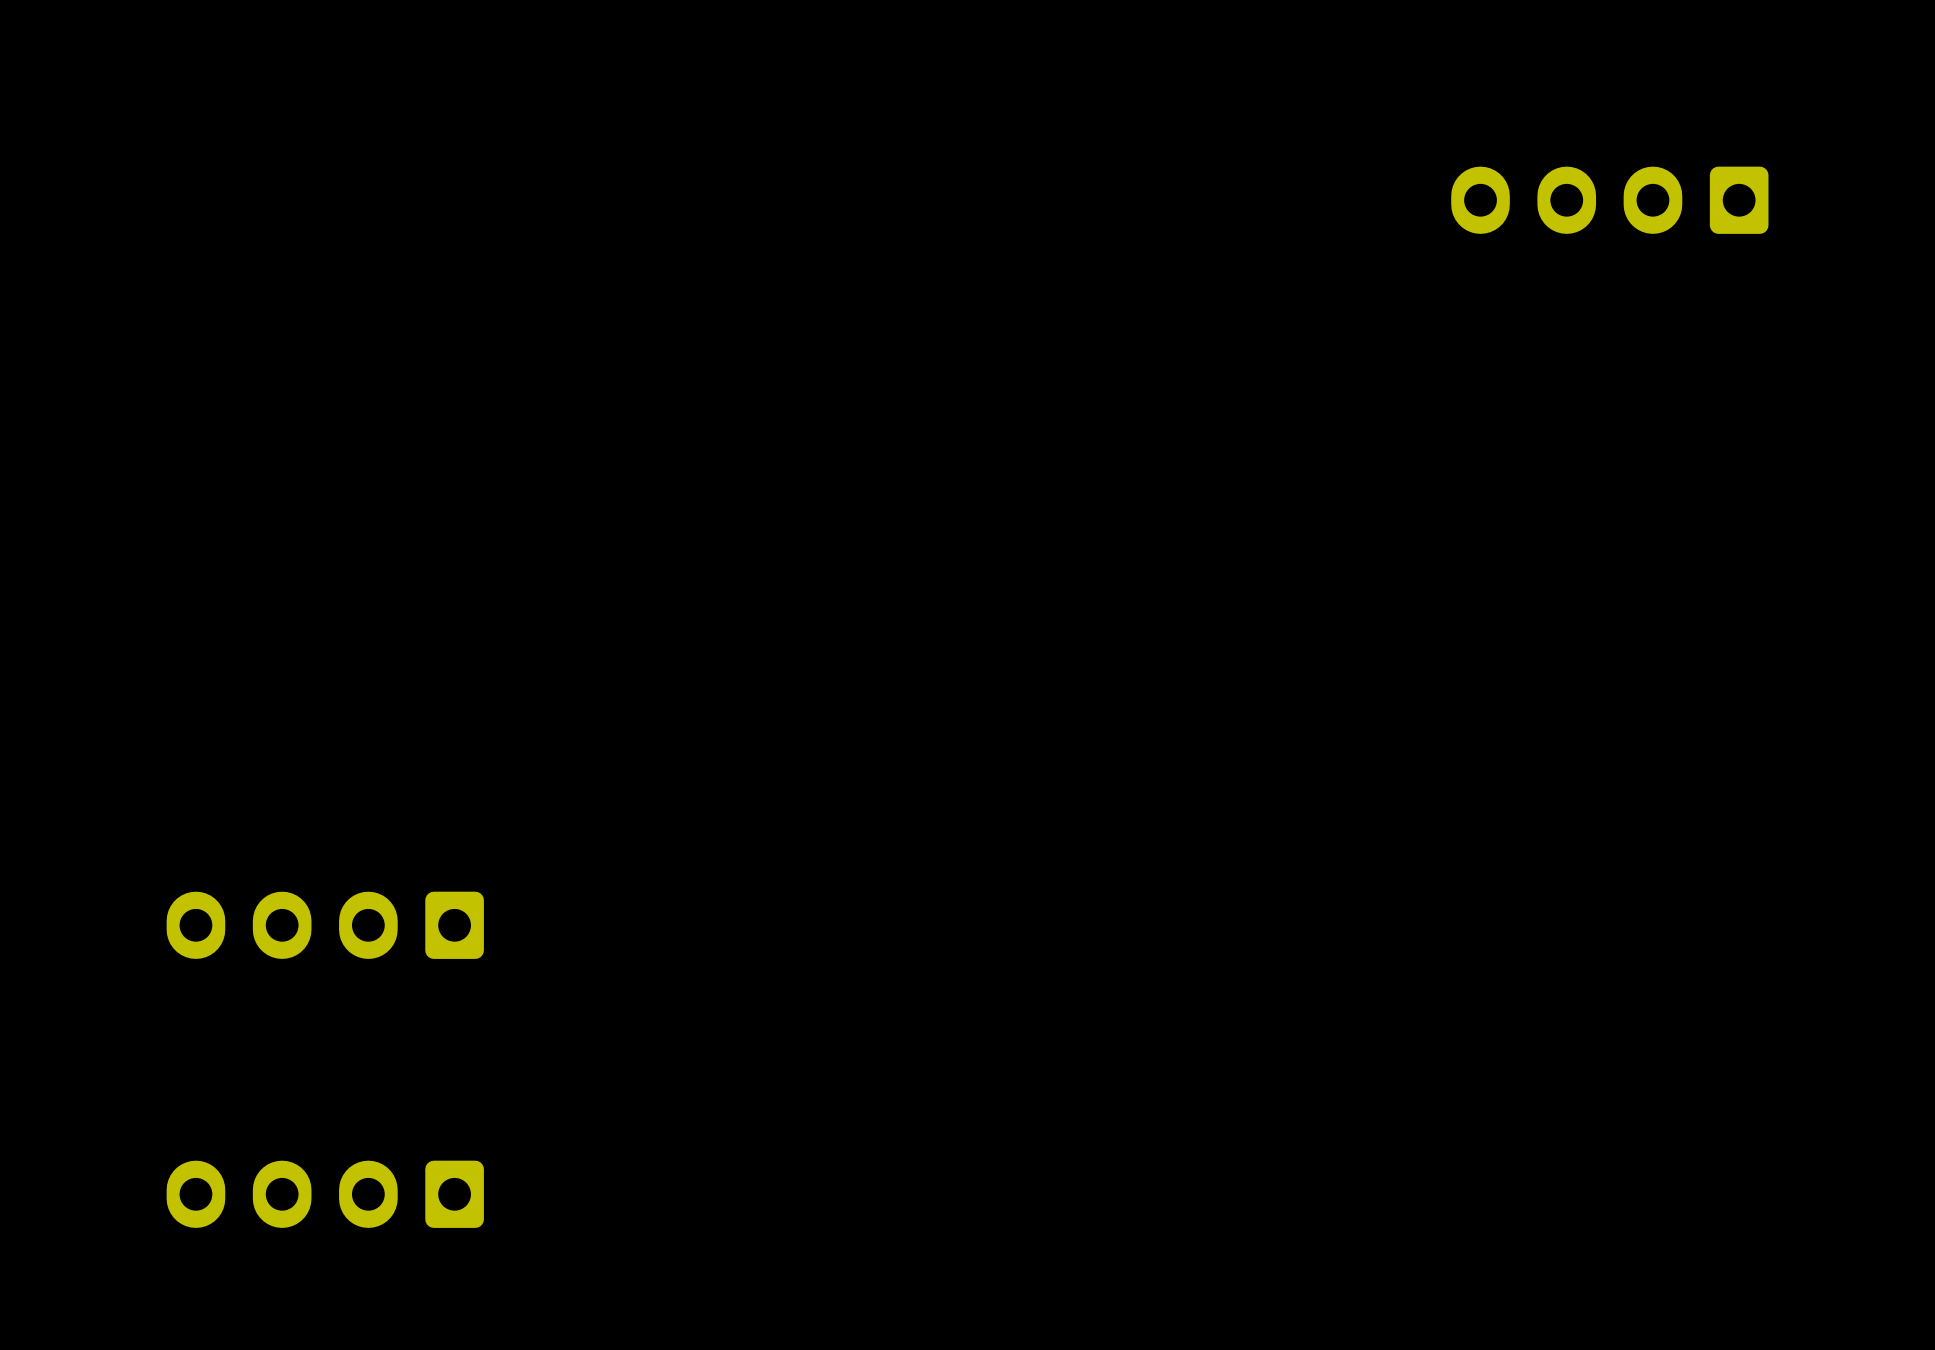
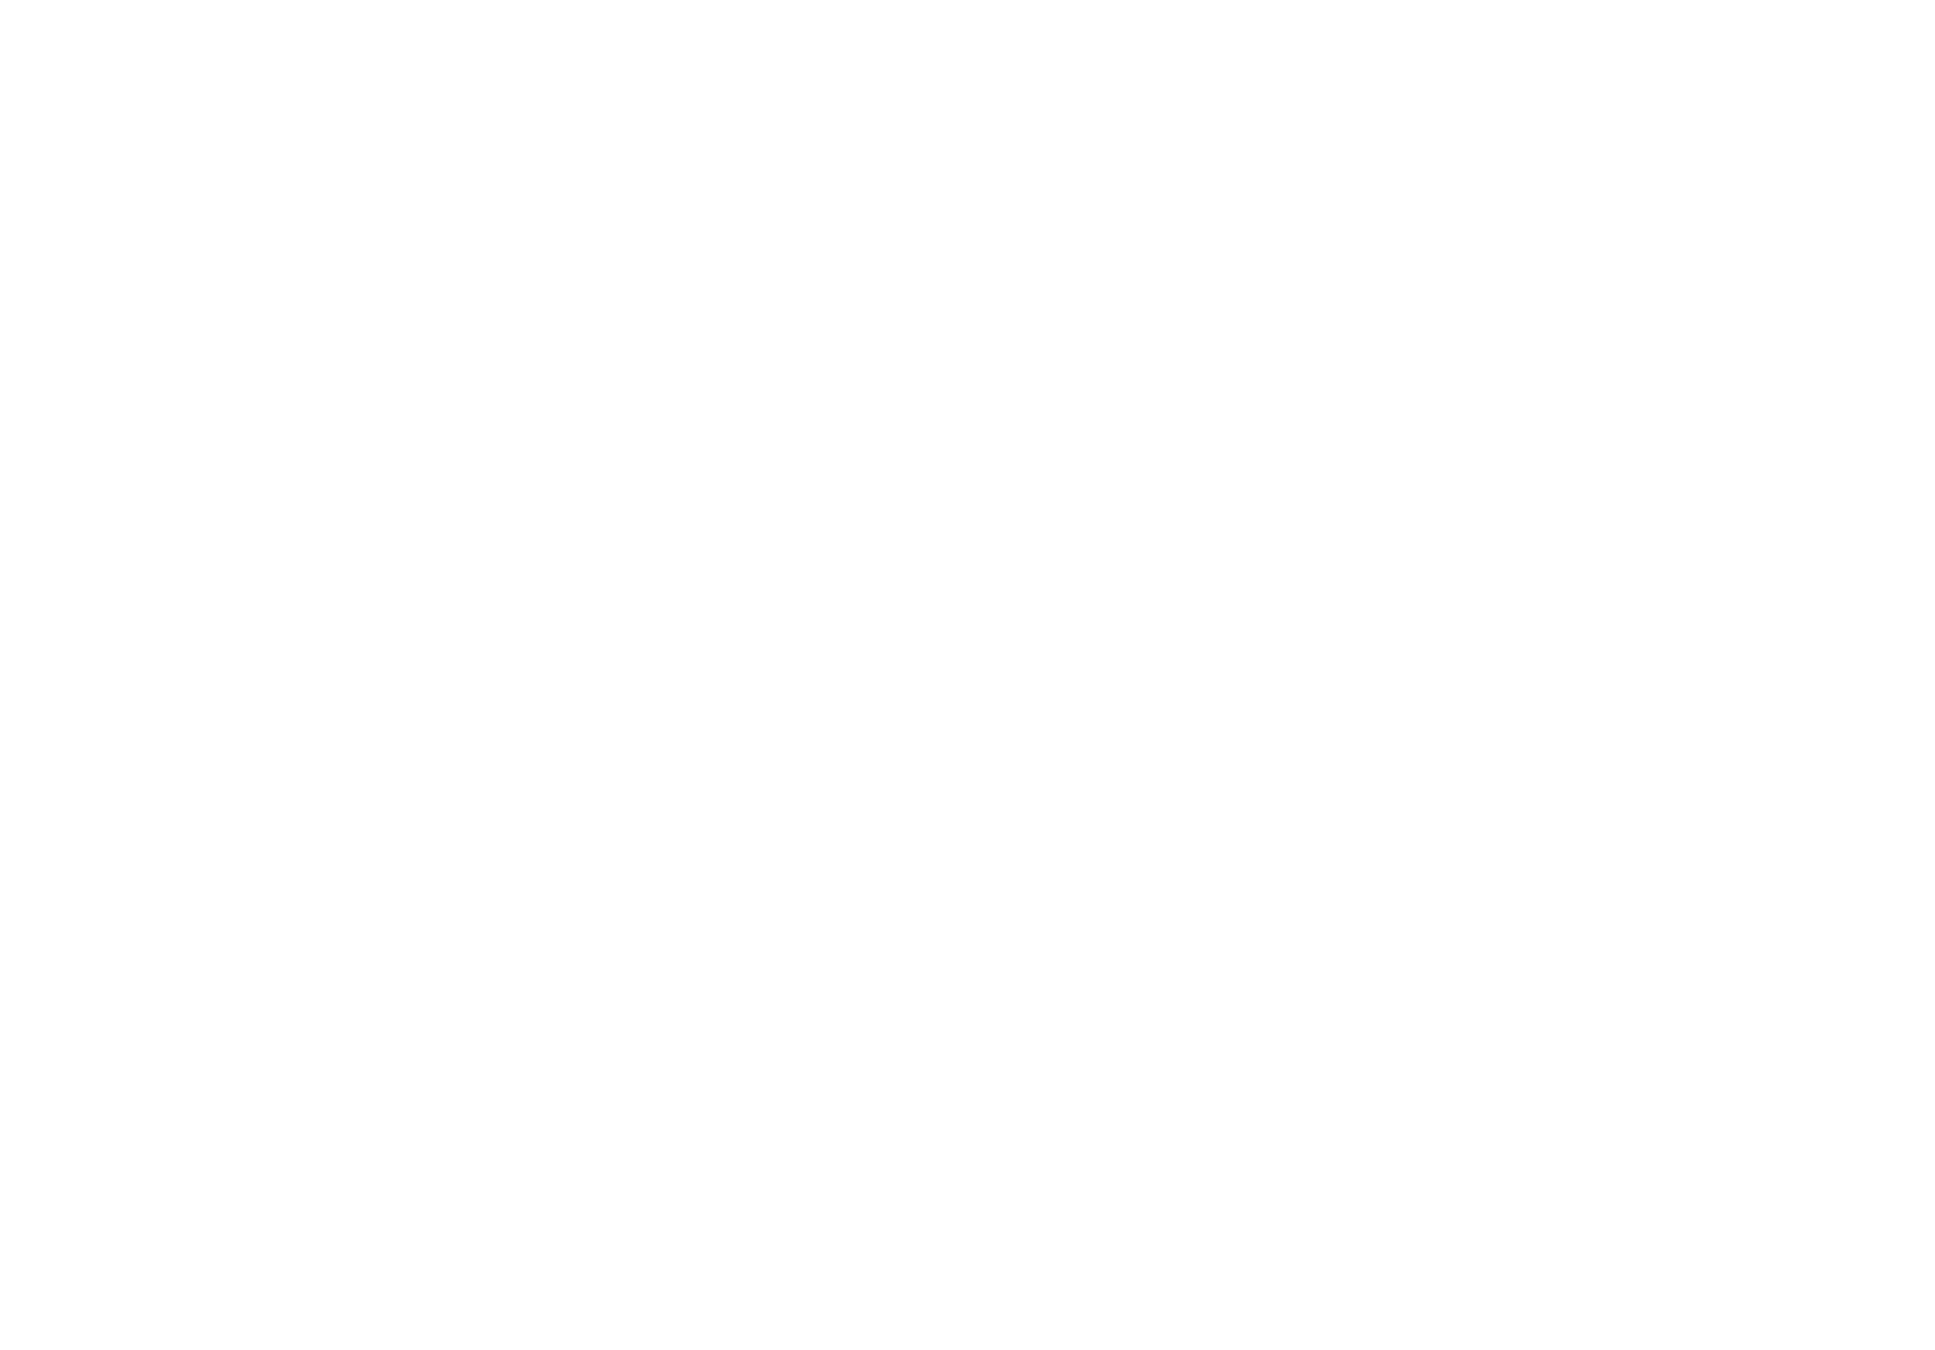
part: (1609, 200) -> none
part: (325, 925) -> none
part: (325, 1194) -> none

